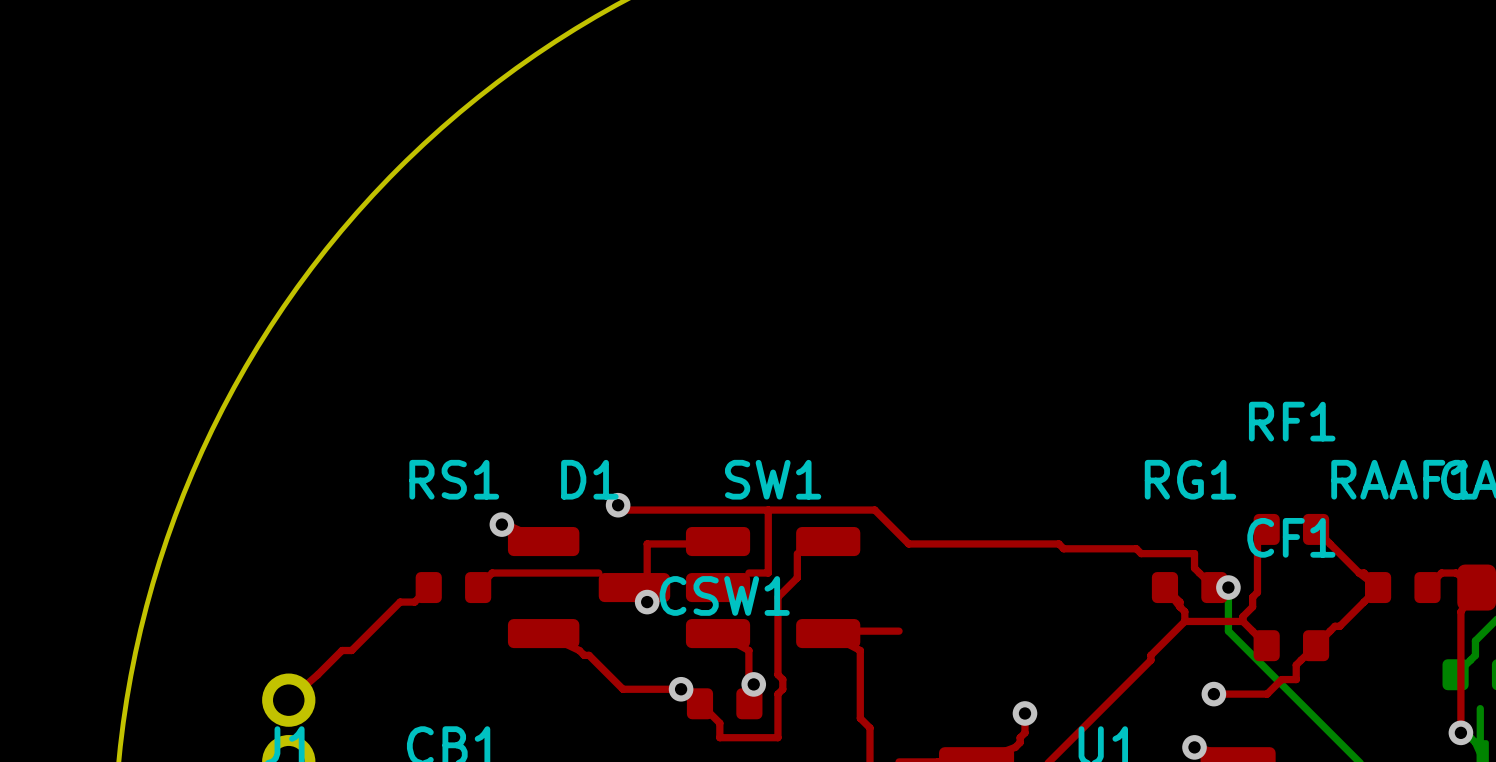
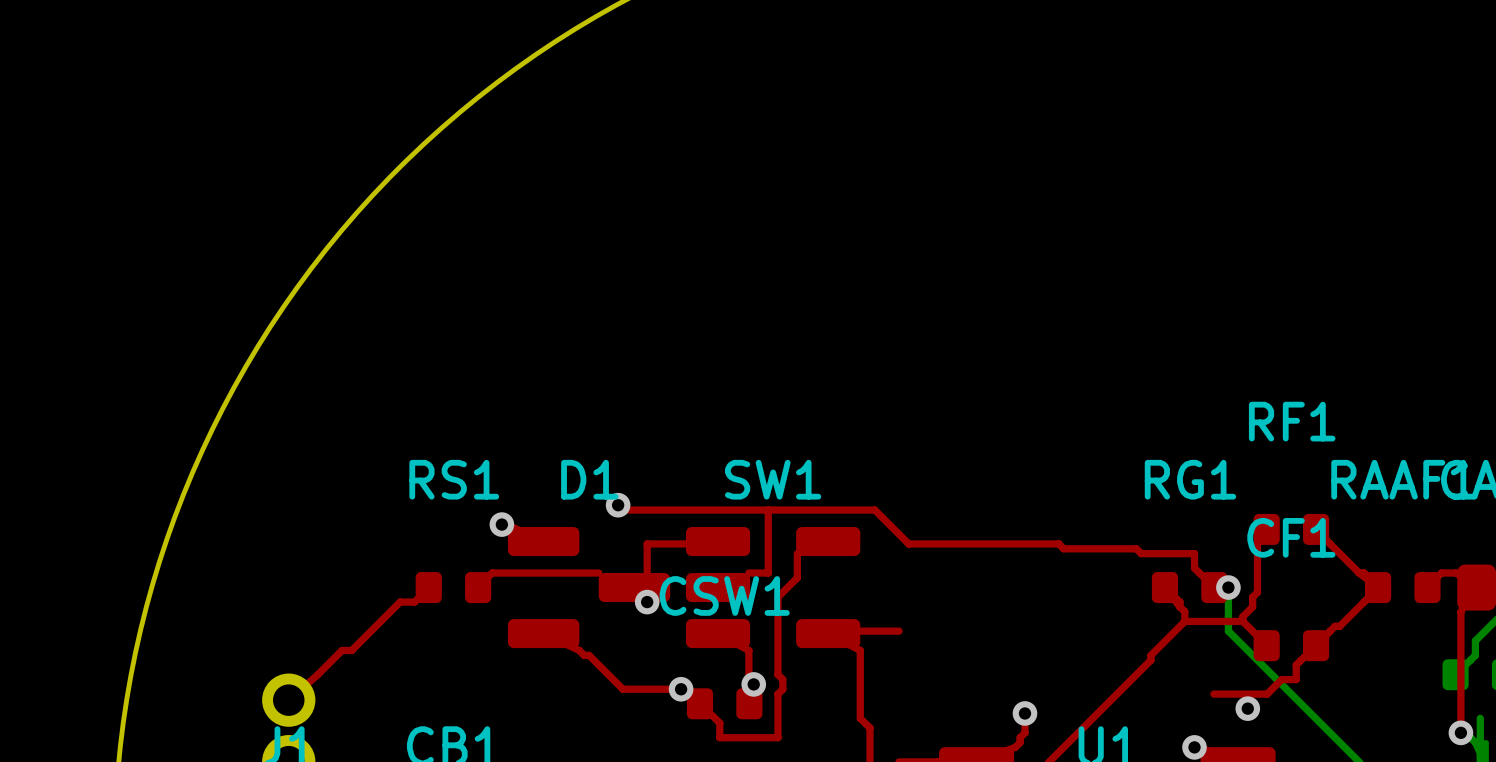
via position: (1213, 694) -> (1247, 708)
bottom track: (1480, 708) (1480, 718) -> none

